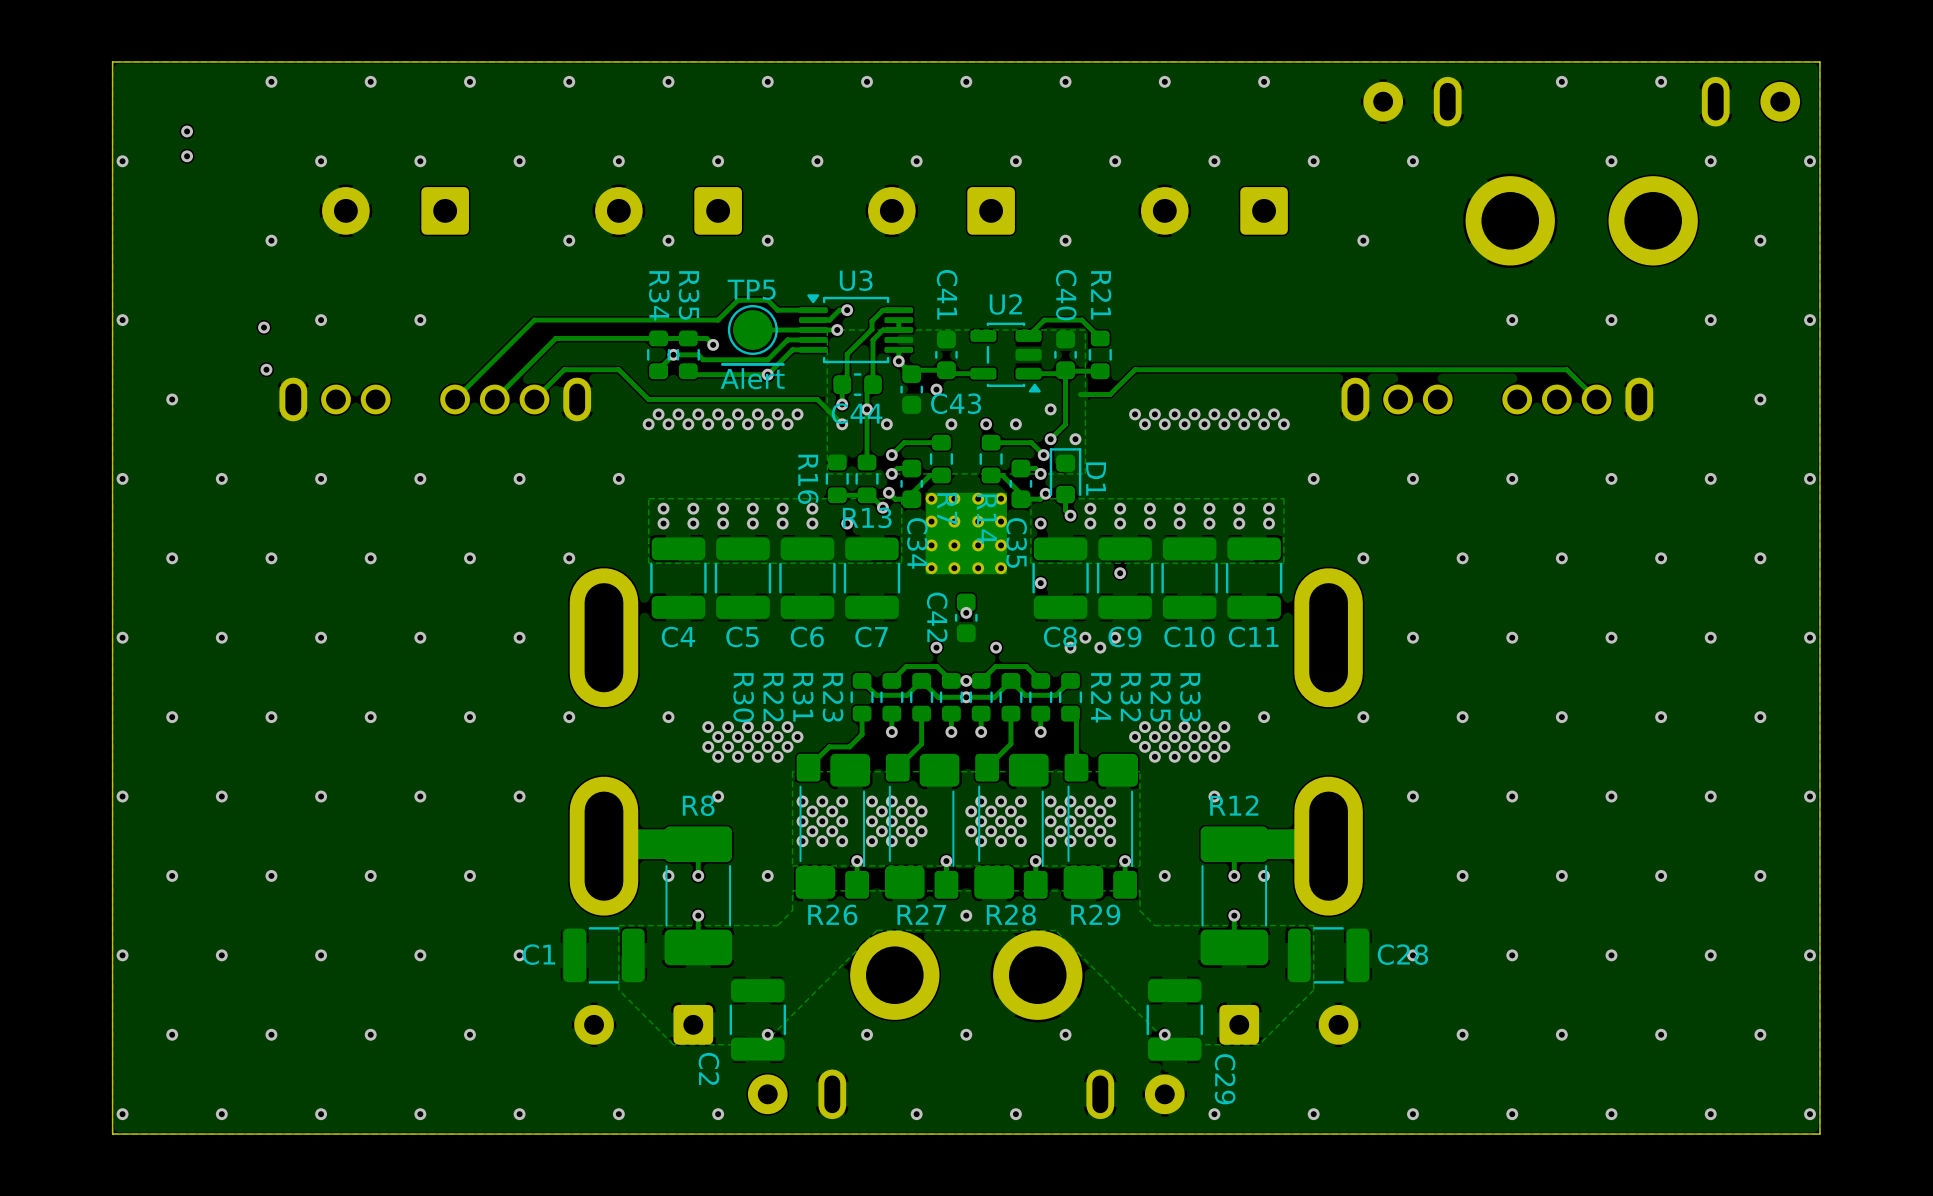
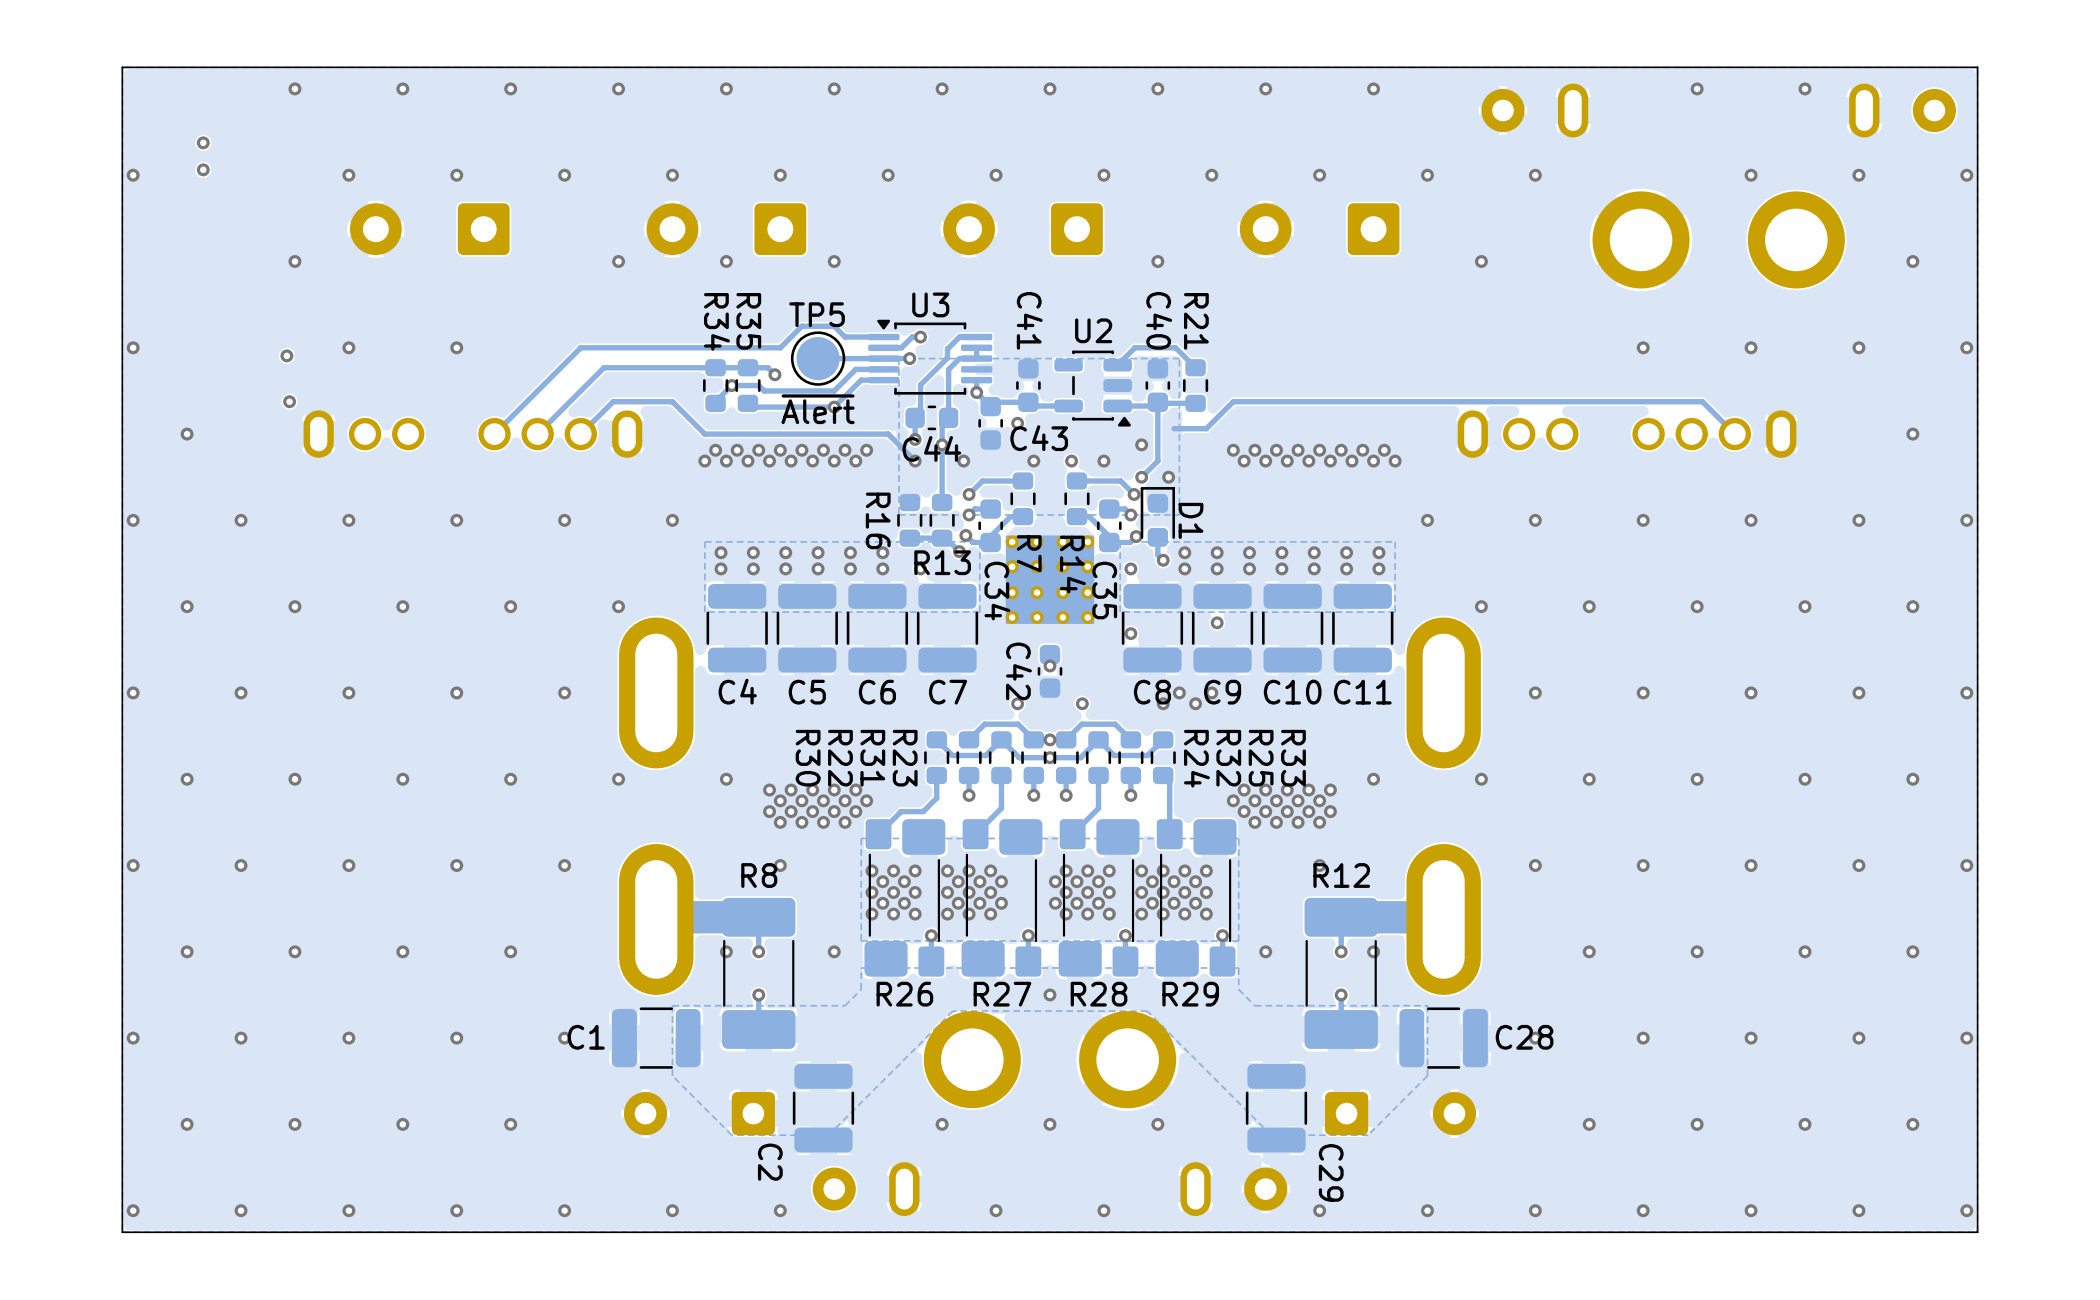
via: (767, 1034) -> none
via: (1164, 1034) -> none

